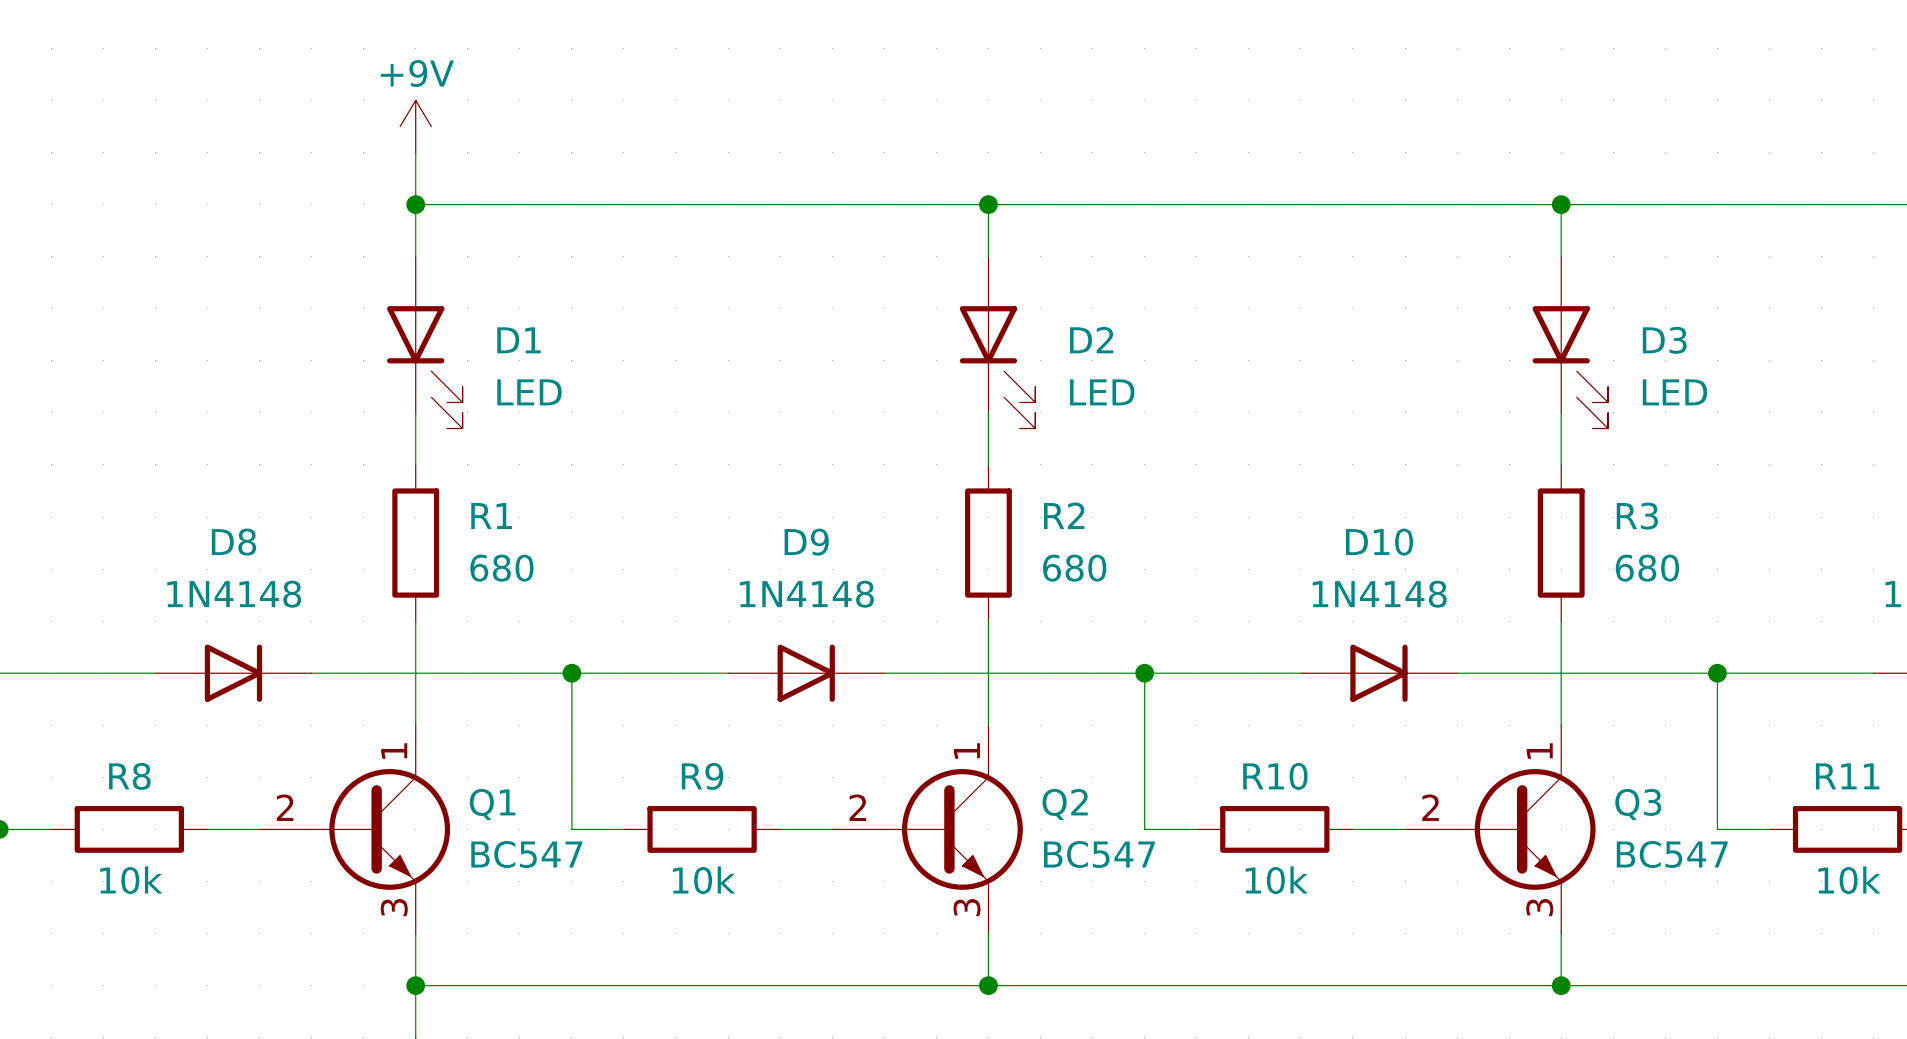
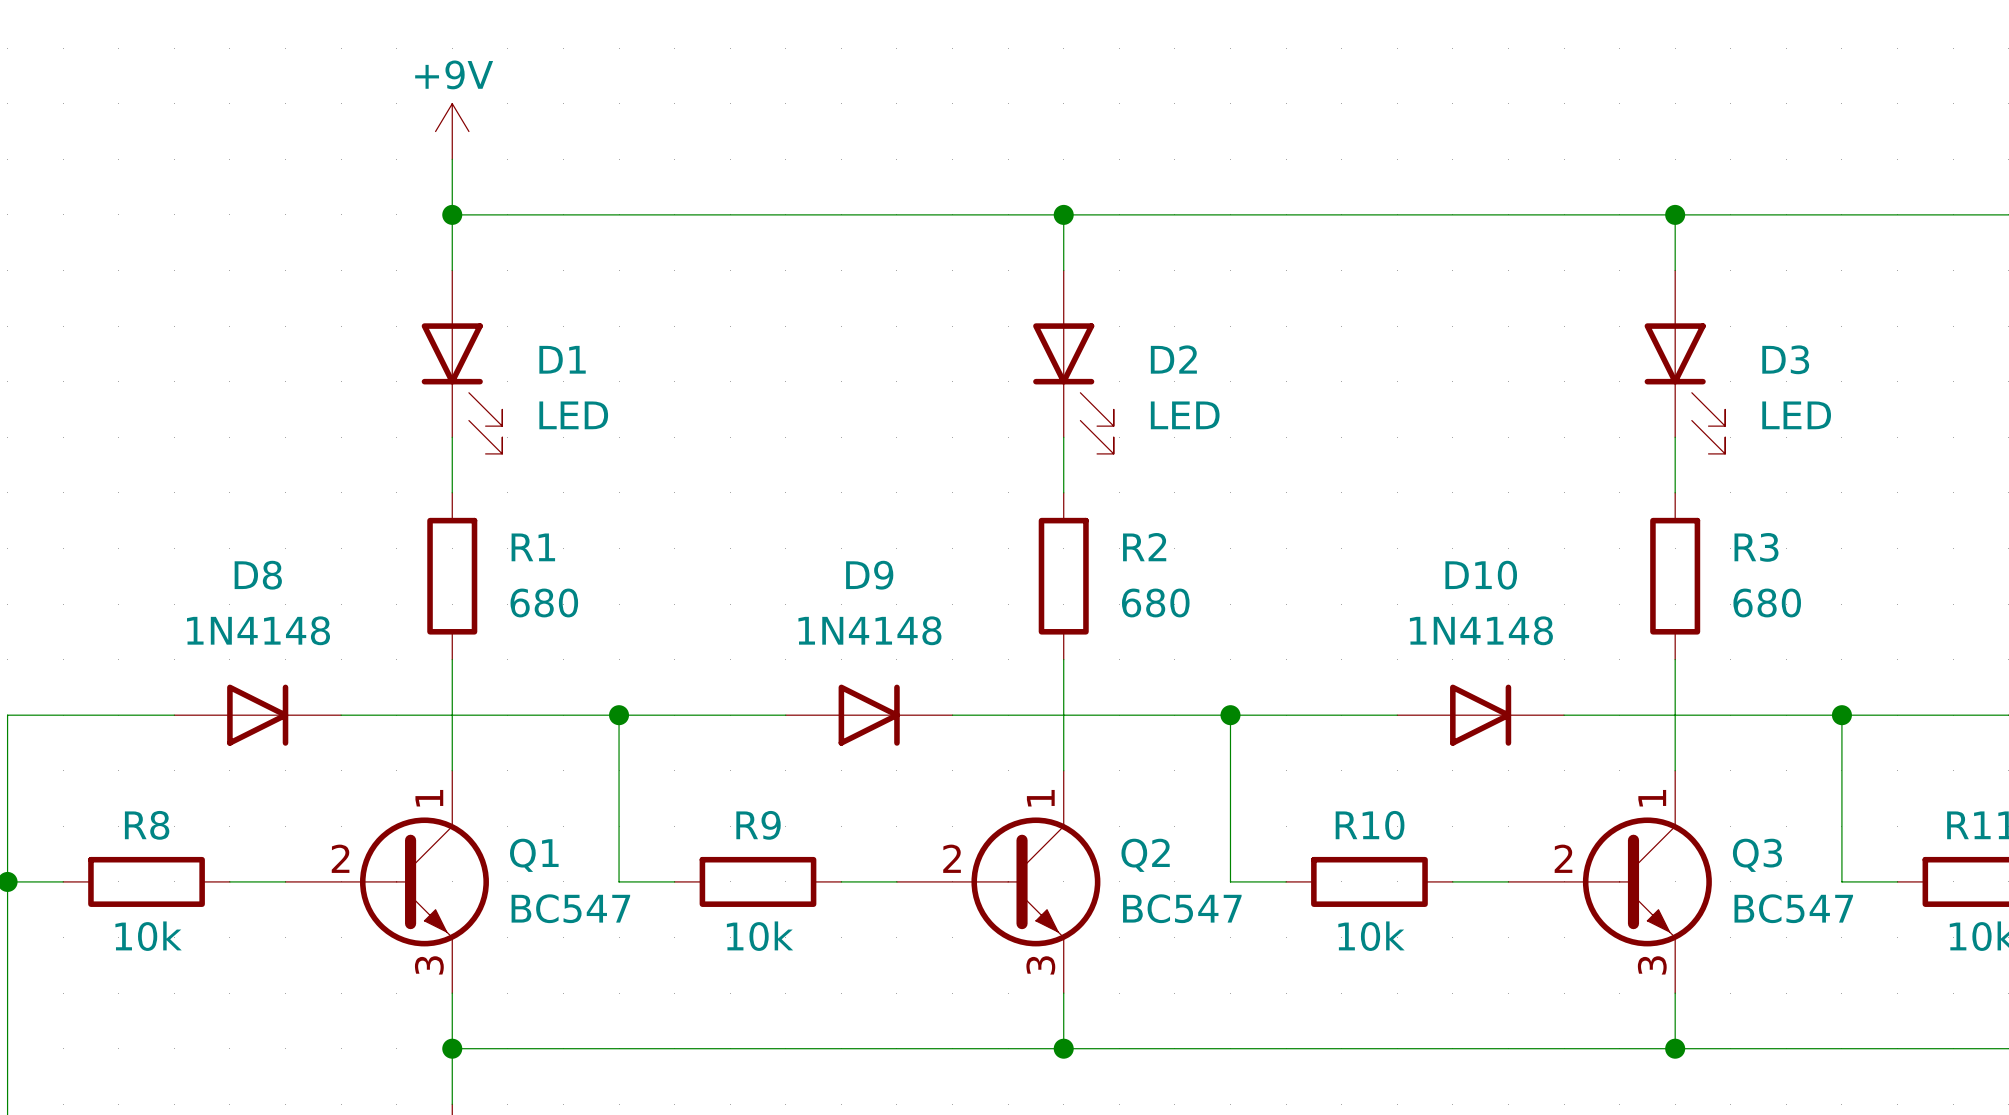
Q1 symbol: [259, 725, 451, 934] -> [285, 770, 489, 994]
Q2 symbol: [832, 725, 1023, 934] -> [896, 770, 1101, 994]
Q3 symbol: [1405, 725, 1596, 934] -> [1508, 770, 1712, 994]

